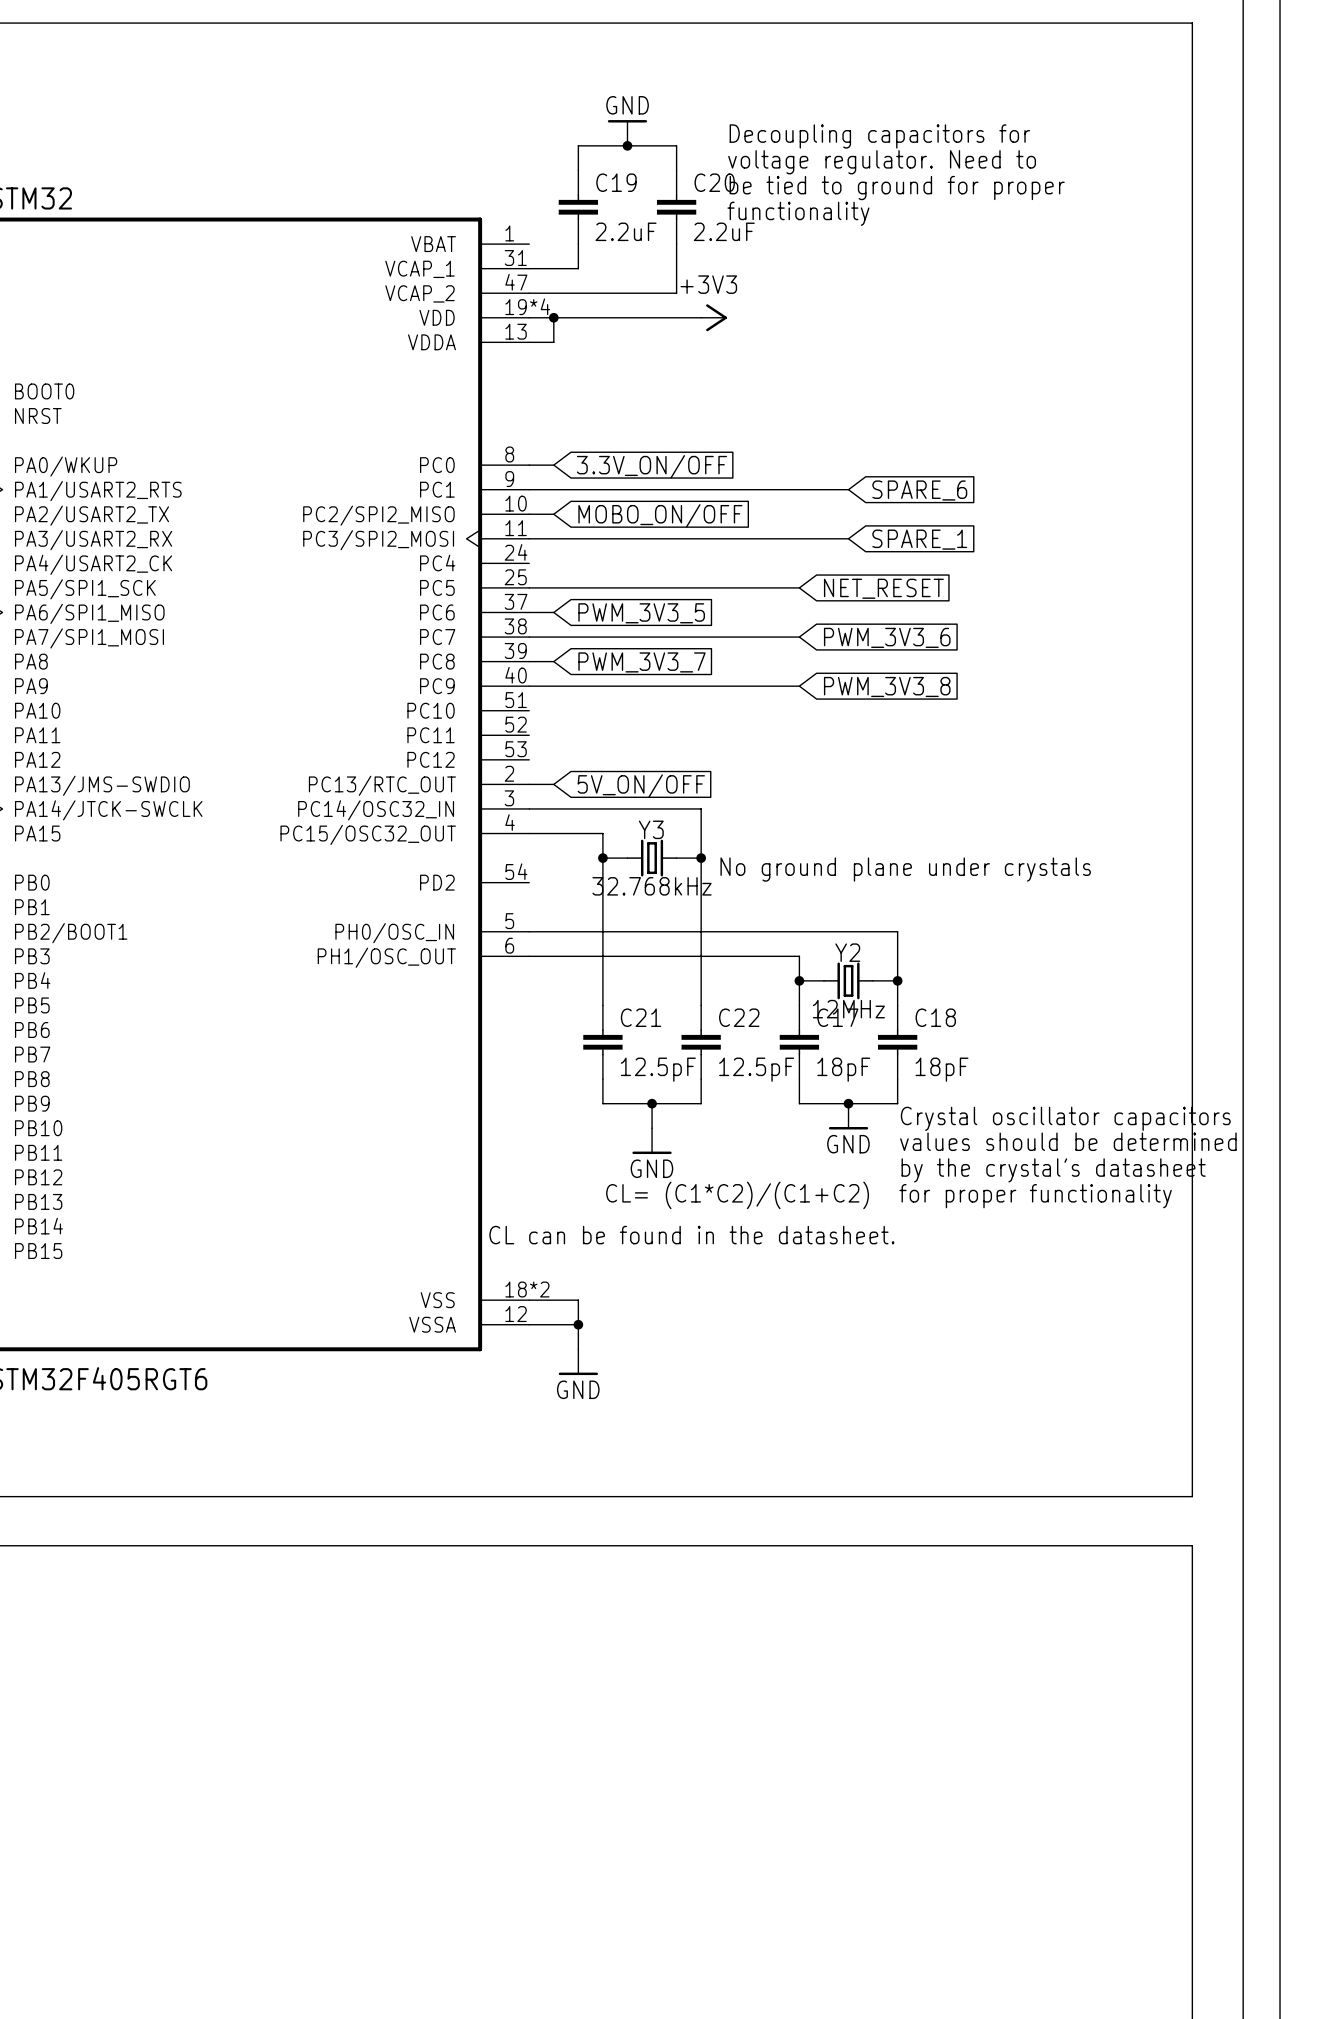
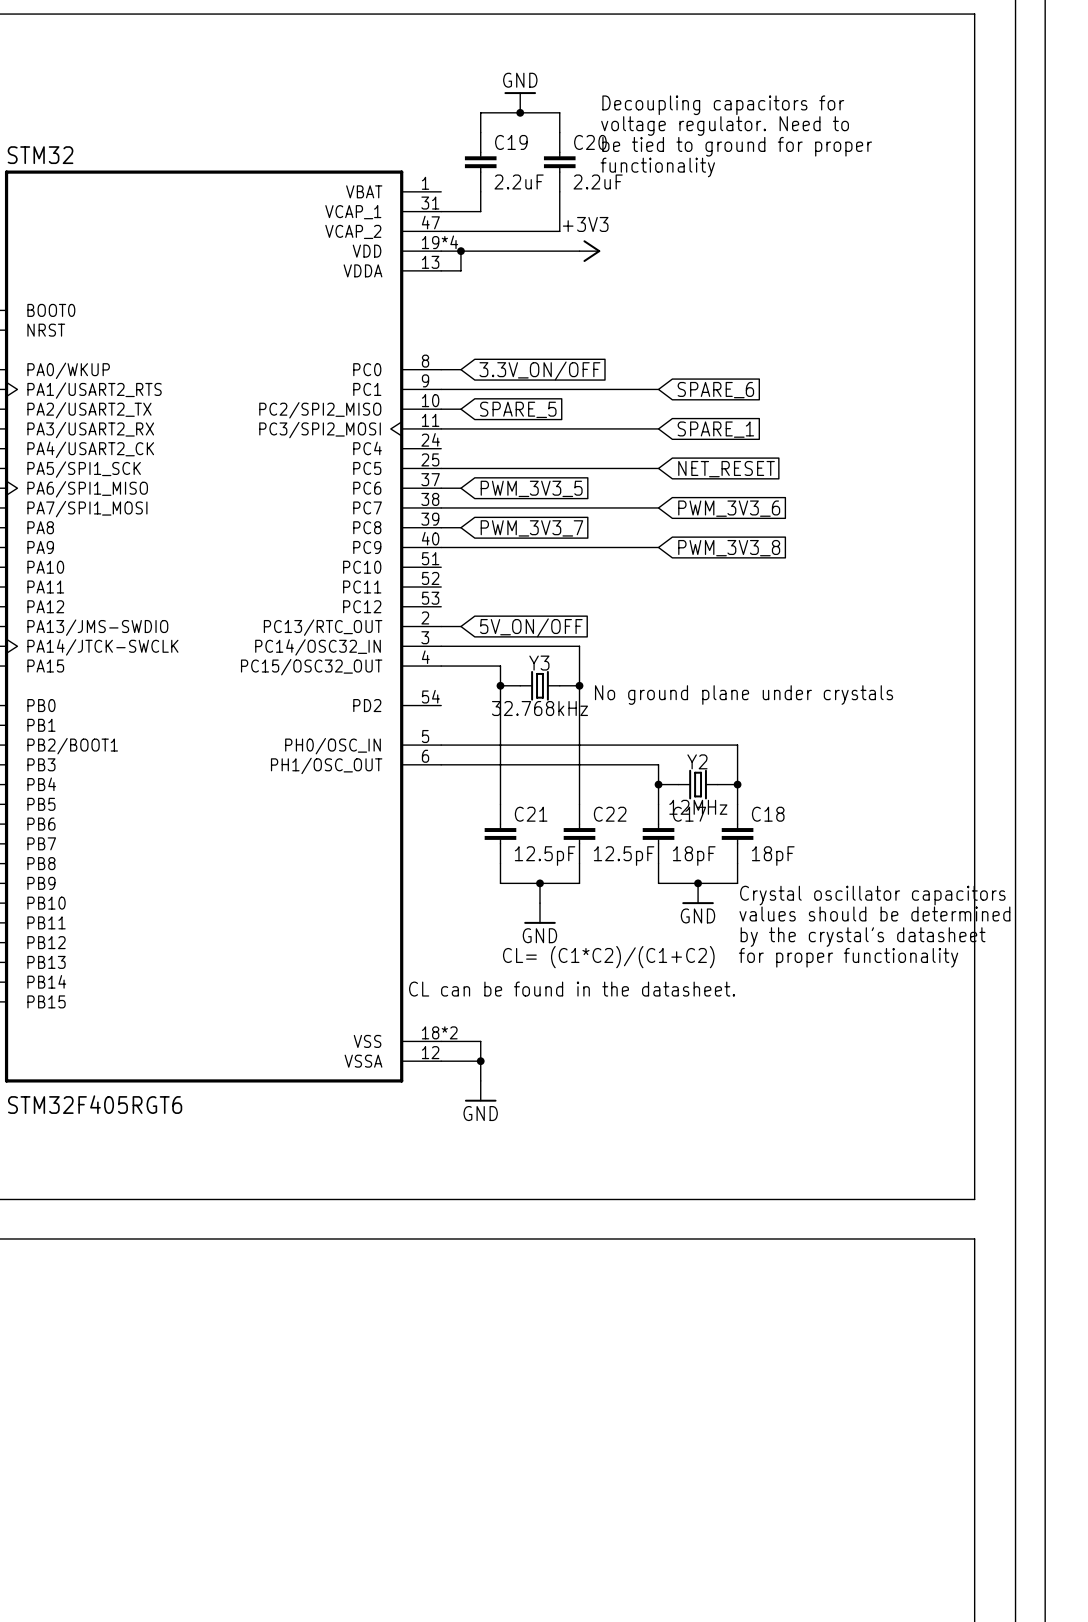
wire: (799, 489) (848, 489) -> none
global label position: SPARE_6 (919, 490) -> SPARE_6 (715, 390)
global label: MOBO_ON/OFF (660, 515) -> SPARE_5 (518, 409)
wire: (799, 538) (848, 538) -> none
global label position: SPARE_1 (919, 539) -> SPARE_1 (715, 429)

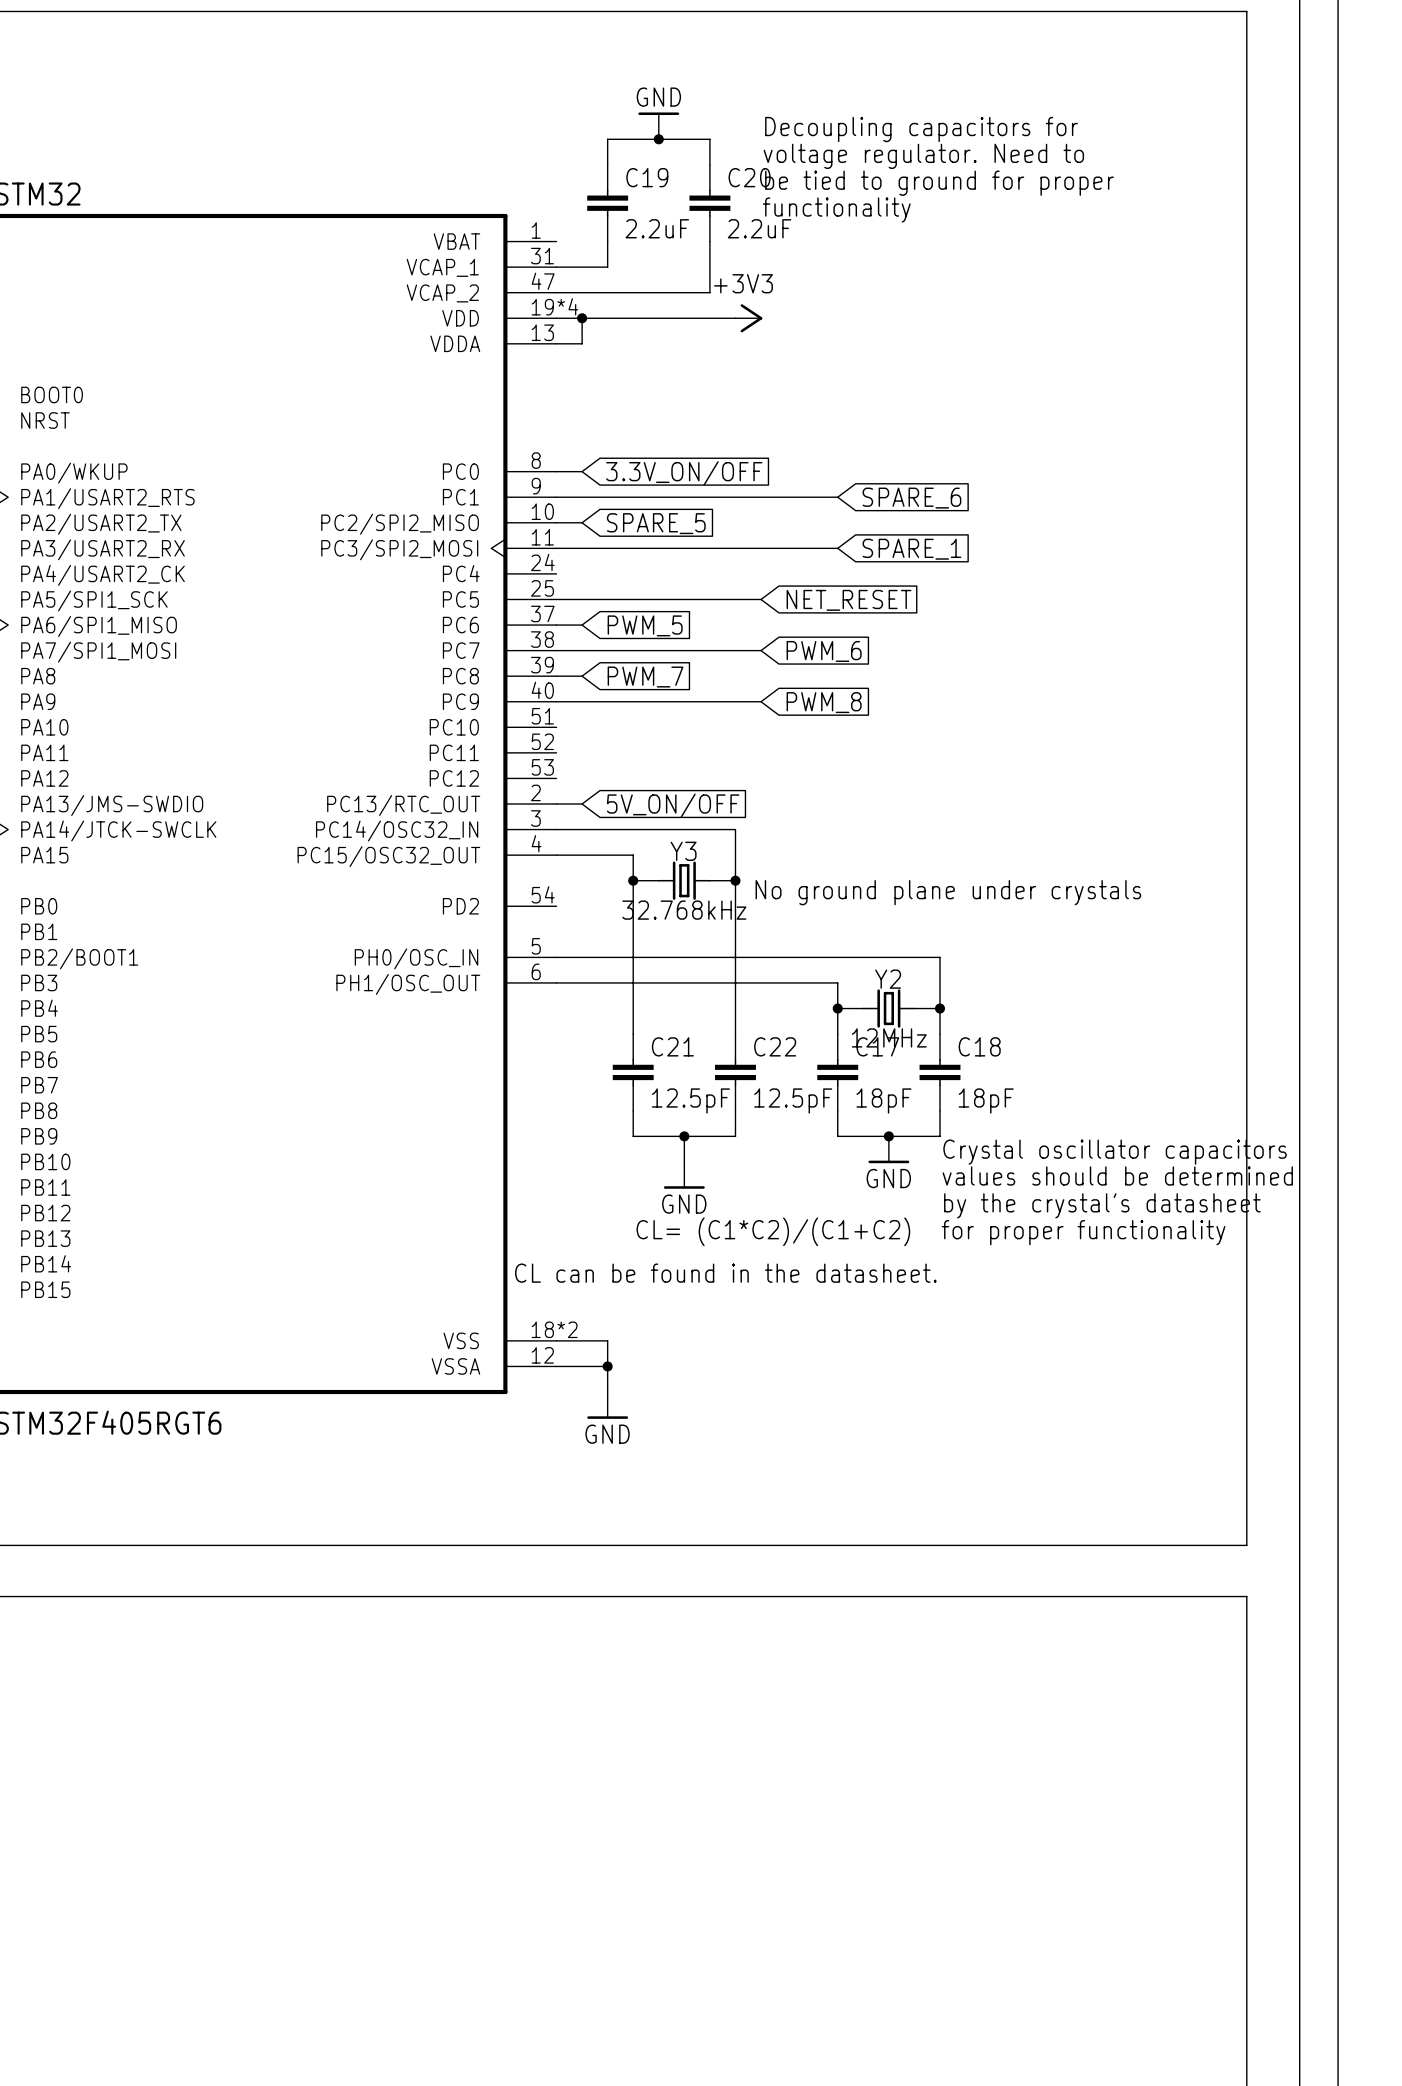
wire: (599, 468) (658, 468) -> none
global label position: NET_RESET (726, 469) -> NET_RESET (849, 600)
global label: PWM_3V3_5 (531, 488) -> PWM_5 (645, 625)
wire: (599, 507) (658, 507) -> none
global label: PWM_3V3_6 (729, 508) -> PWM_6 (824, 651)
global label: PWM_3V3_7 (531, 528) -> PWM_7 (645, 677)
wire: (599, 547) (658, 547) -> none
global label: PWM_3V3_8 (729, 548) -> PWM_8 (824, 702)

